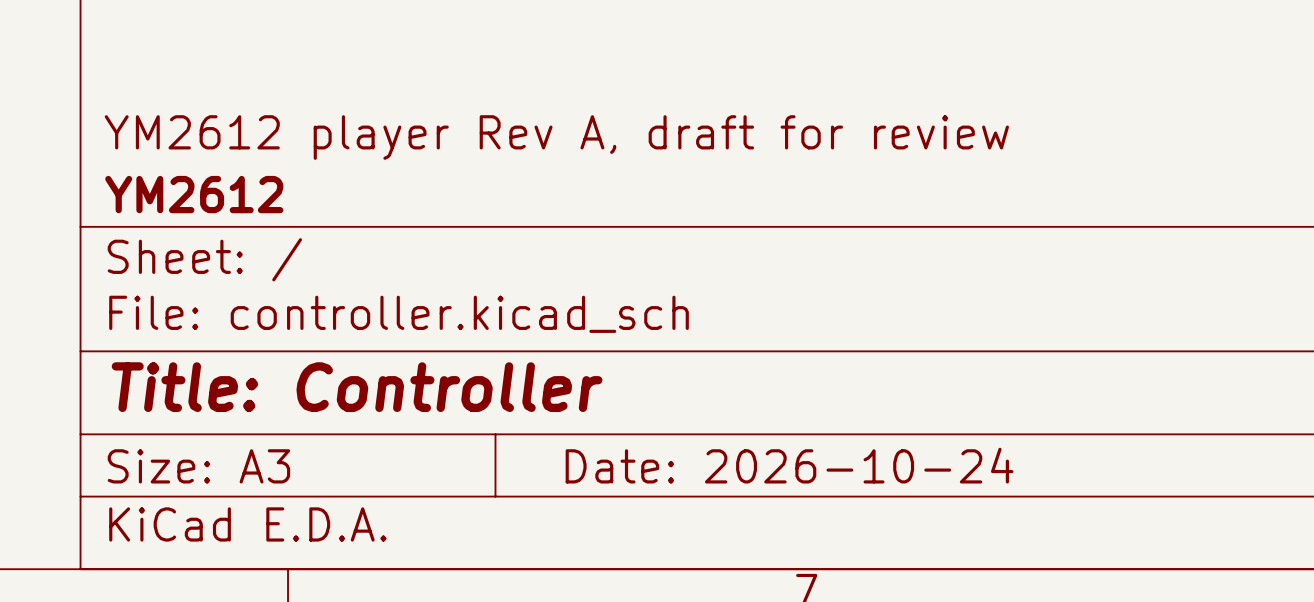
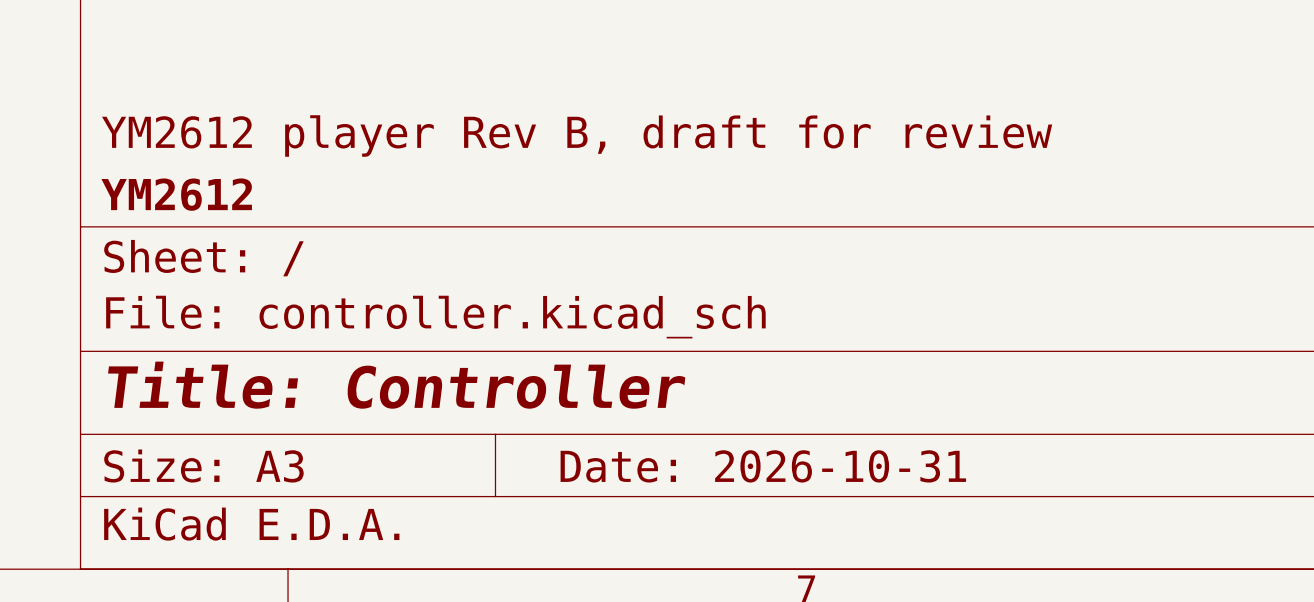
title block: YM2612 player Rev A, draft for review (556, 137) -> YM2612 player Rev B, draft for review (577, 135)
title block: Date: 2026-10-24 (789, 465) -> Date: 2026-10-31 (763, 466)

